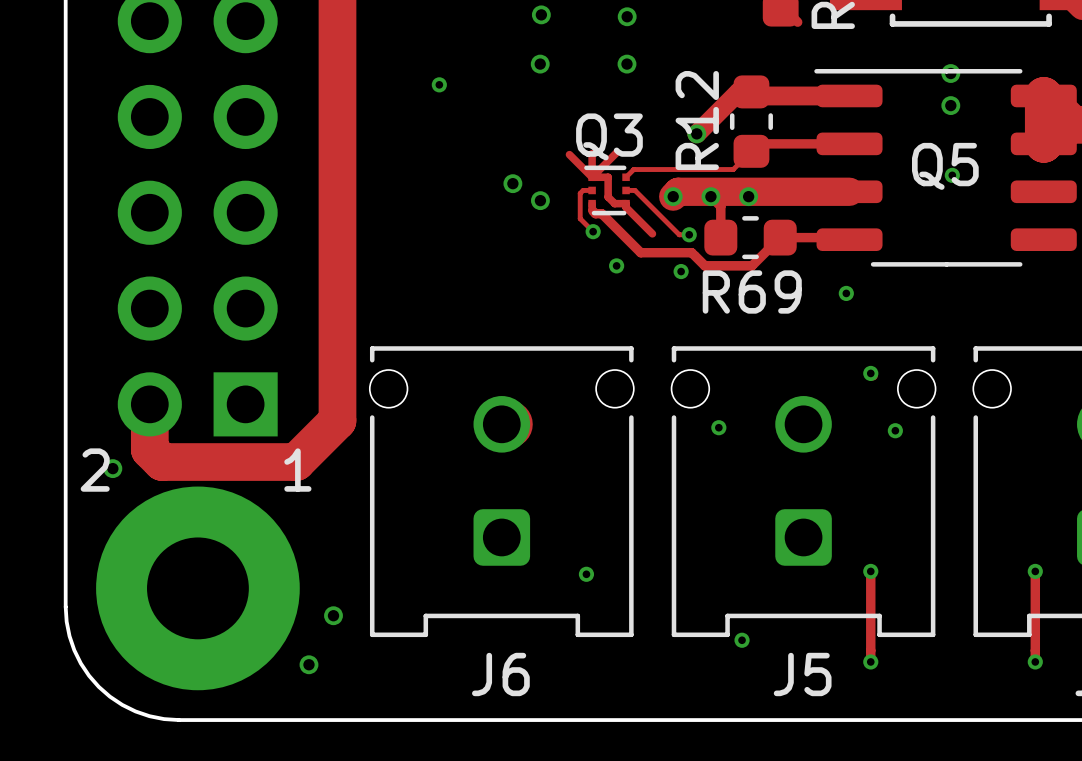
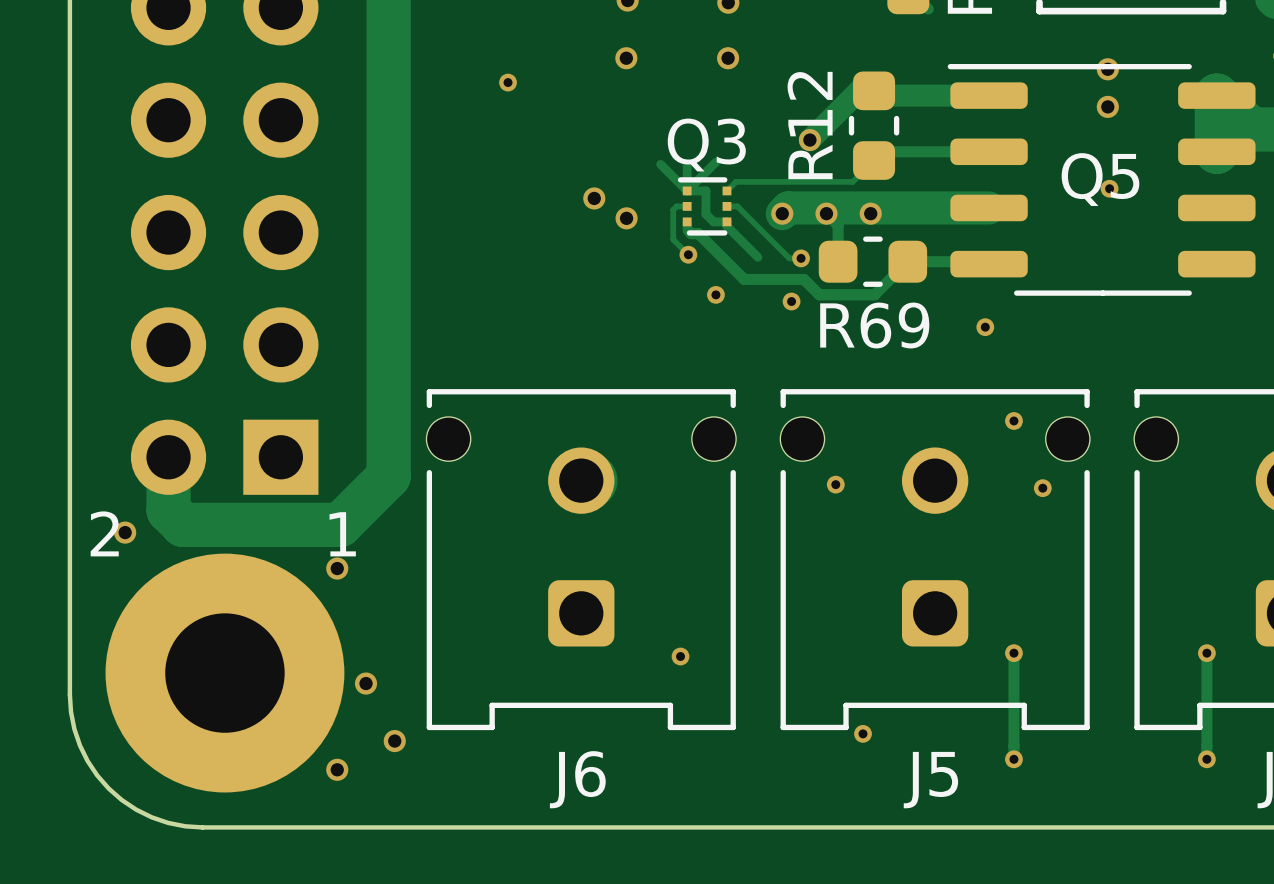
via: none -> (337, 568)
via position: (333, 615) -> (366, 683)
via: none -> (394, 741)
via position: (308, 664) -> (337, 769)

